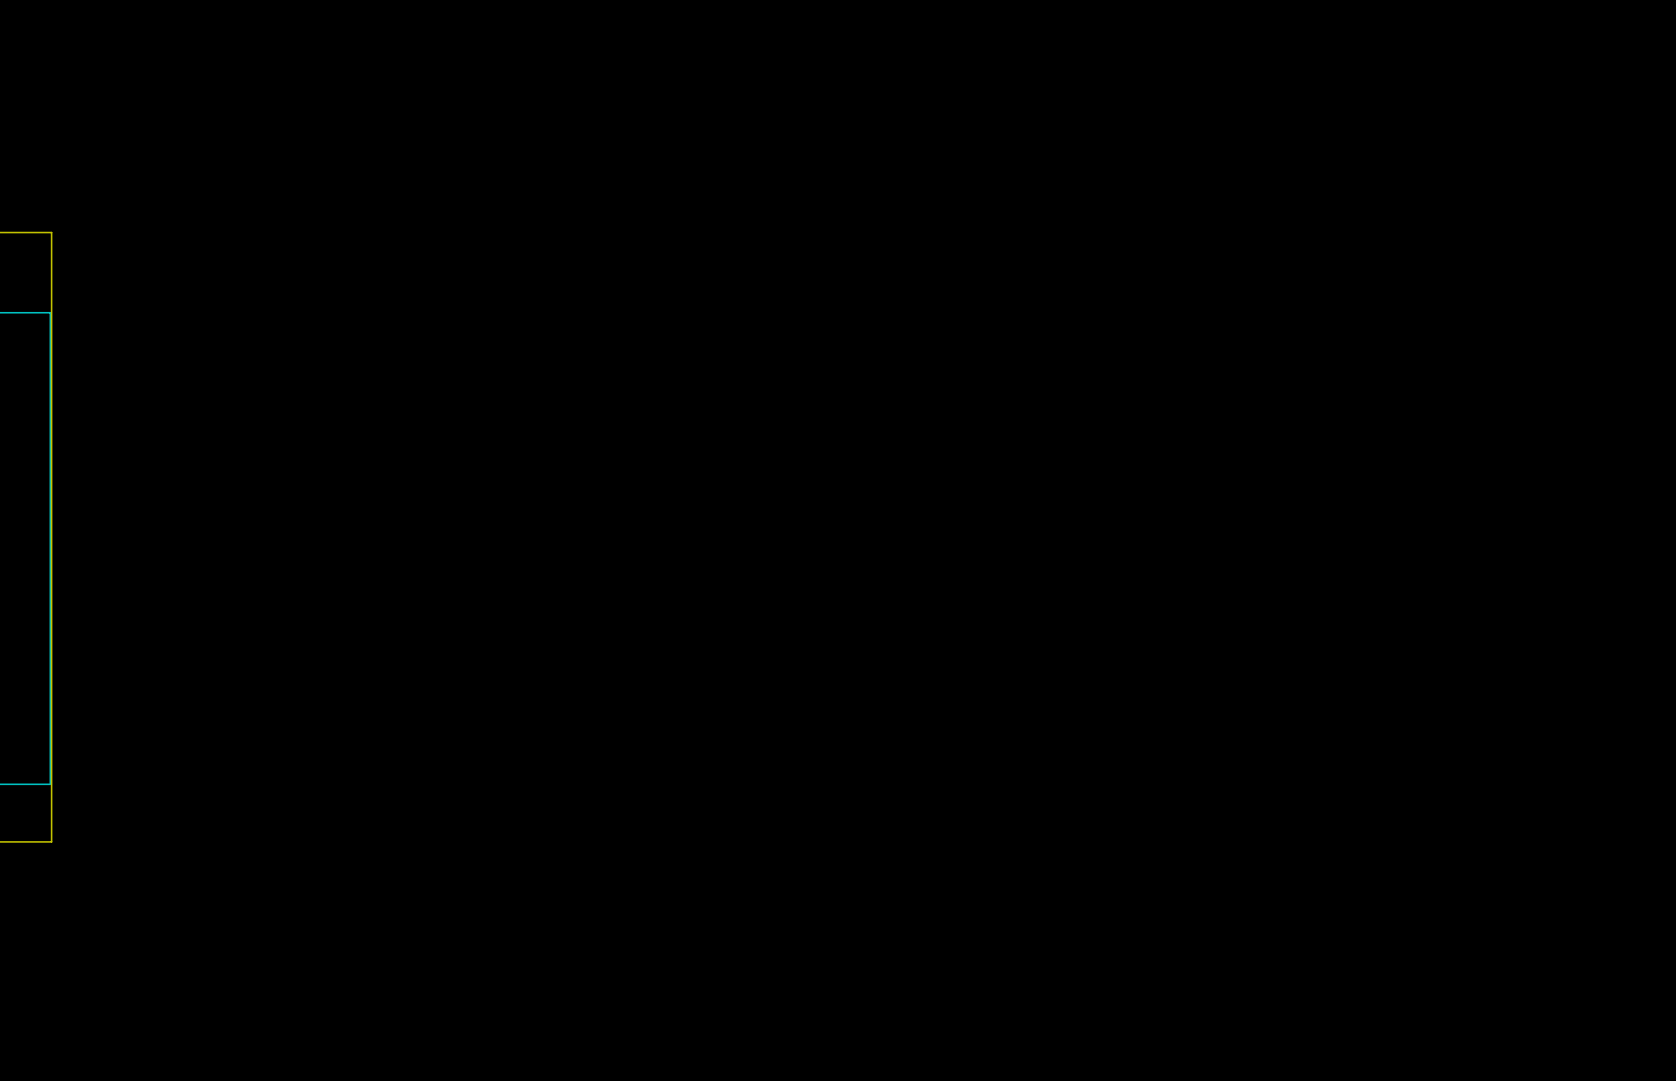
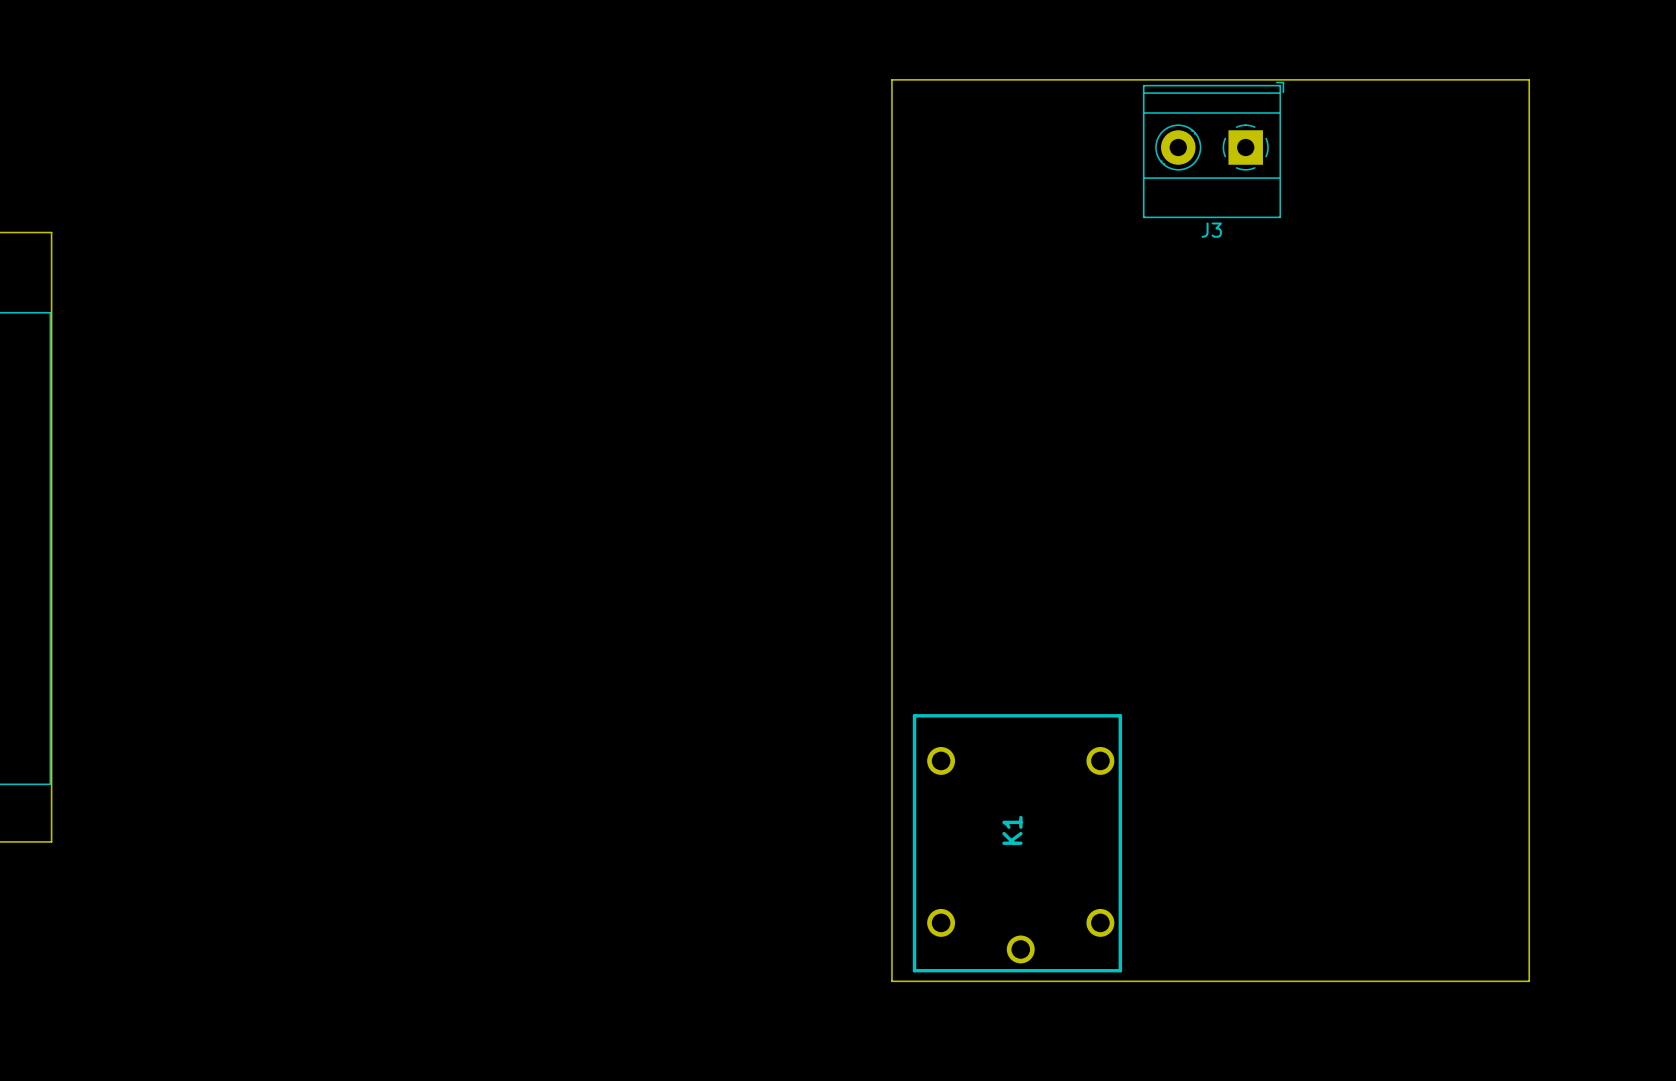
board edge: none -> (891, 79) (1529, 79) (1529, 981) (891, 981) (891, 79)
J3: none -> (1213, 149)
K1: none -> (1017, 843)

